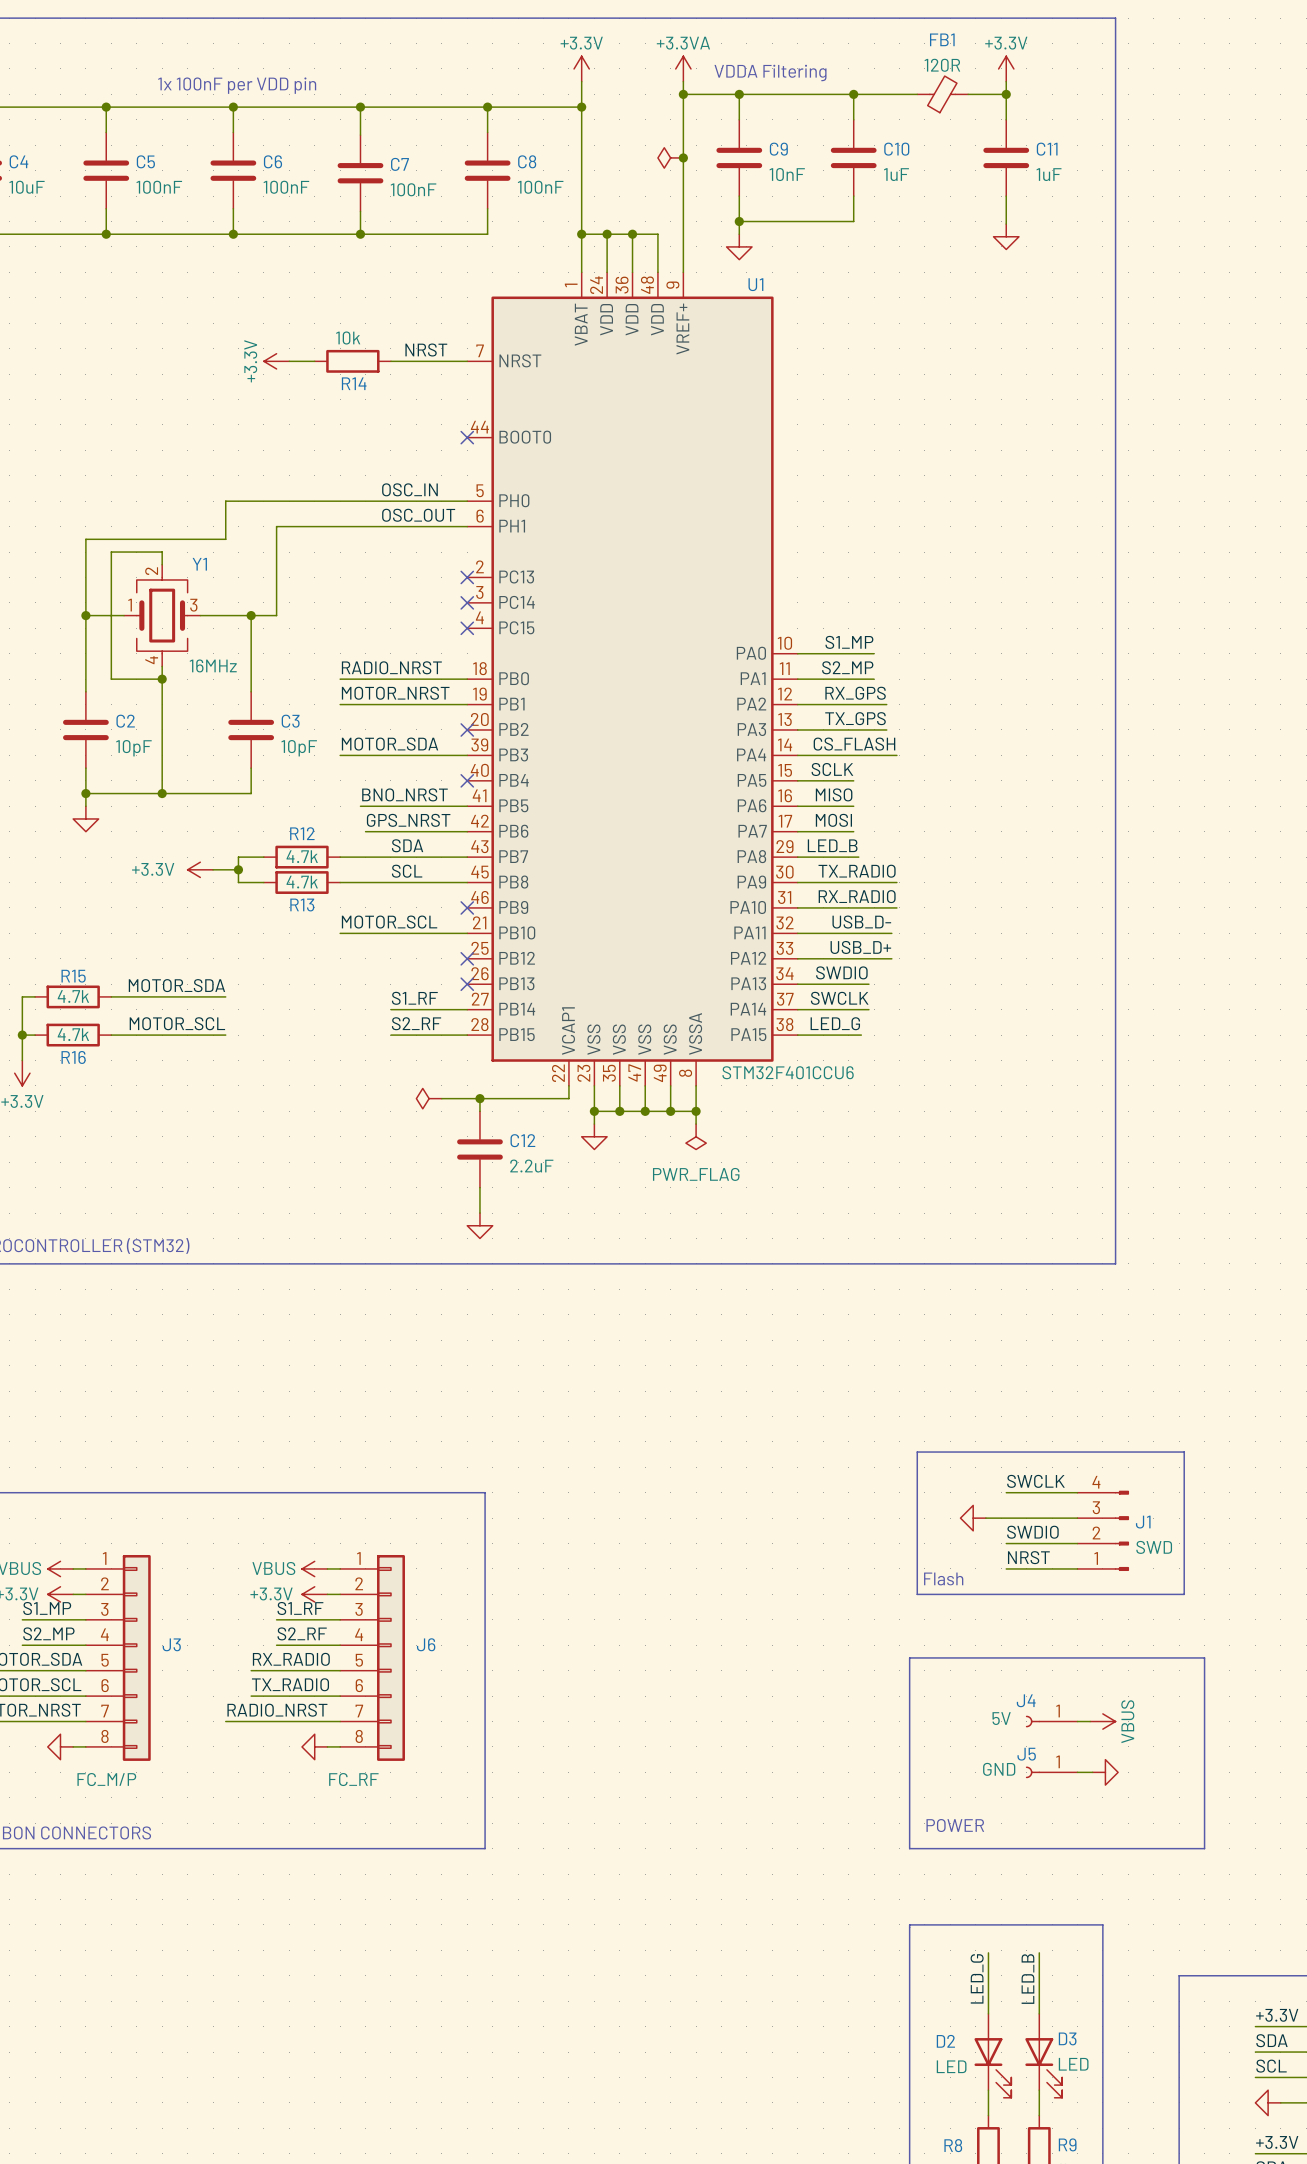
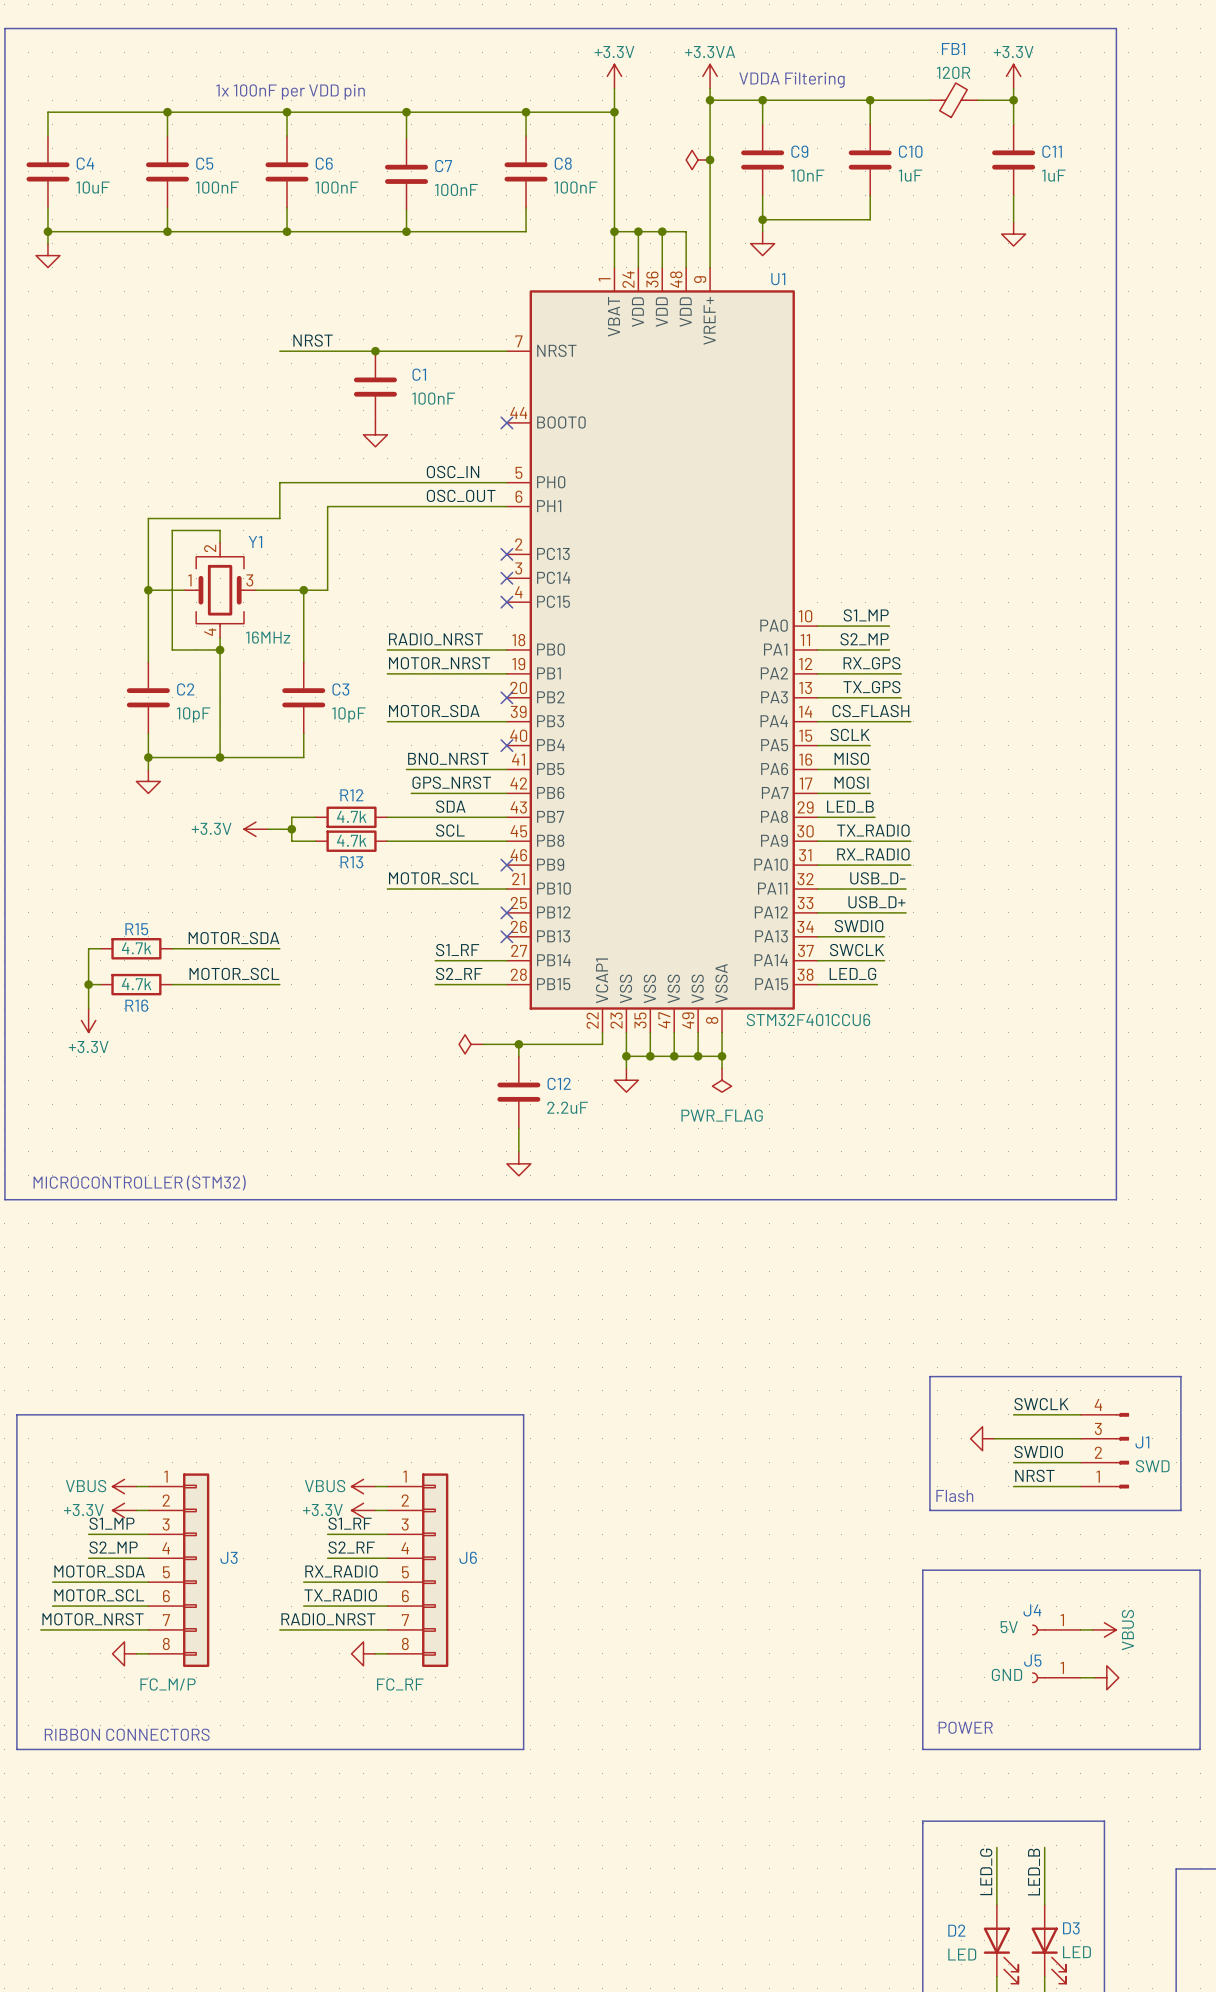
label position: NRST (426, 350) -> NRST (313, 340)
wire: none -> (279, 351) (339, 351)
power symbol: +3.3V (276, 361) -> none
wire: none -> (363, 351) (435, 351)
junction: none -> (375, 351)
R14: 10k (352, 361) -> none
C1: none -> 100nF (375, 387)
power symbol: none -> (375, 434)

